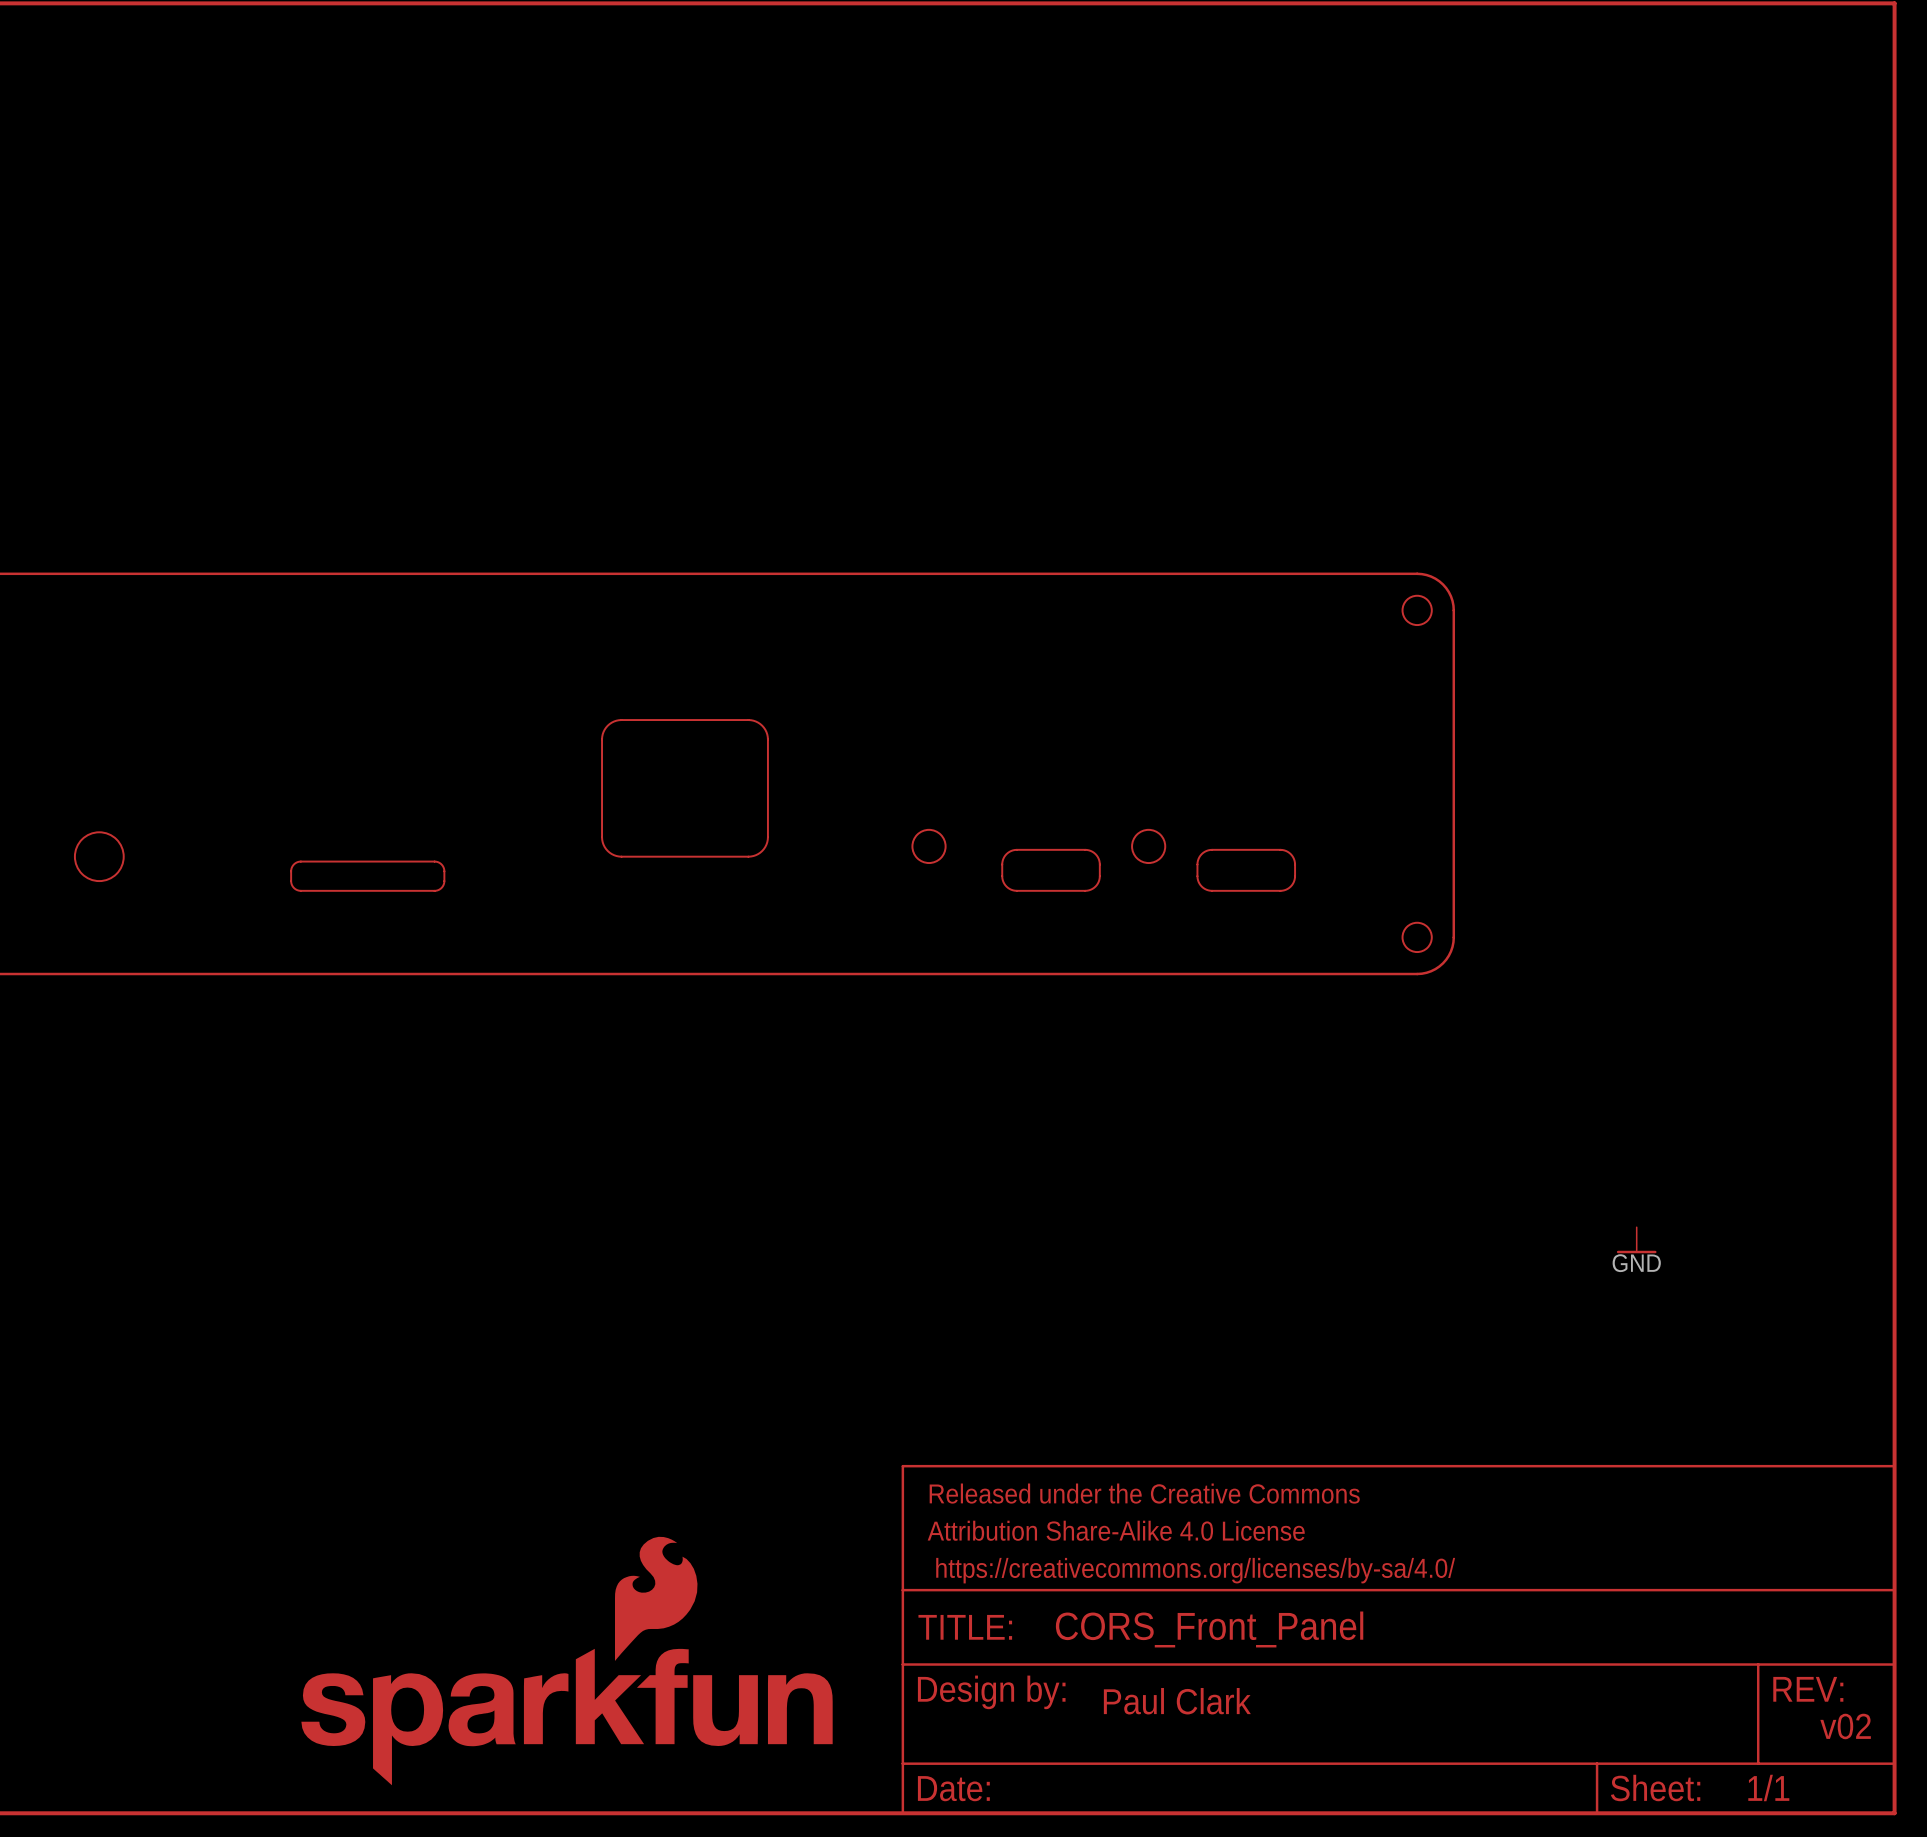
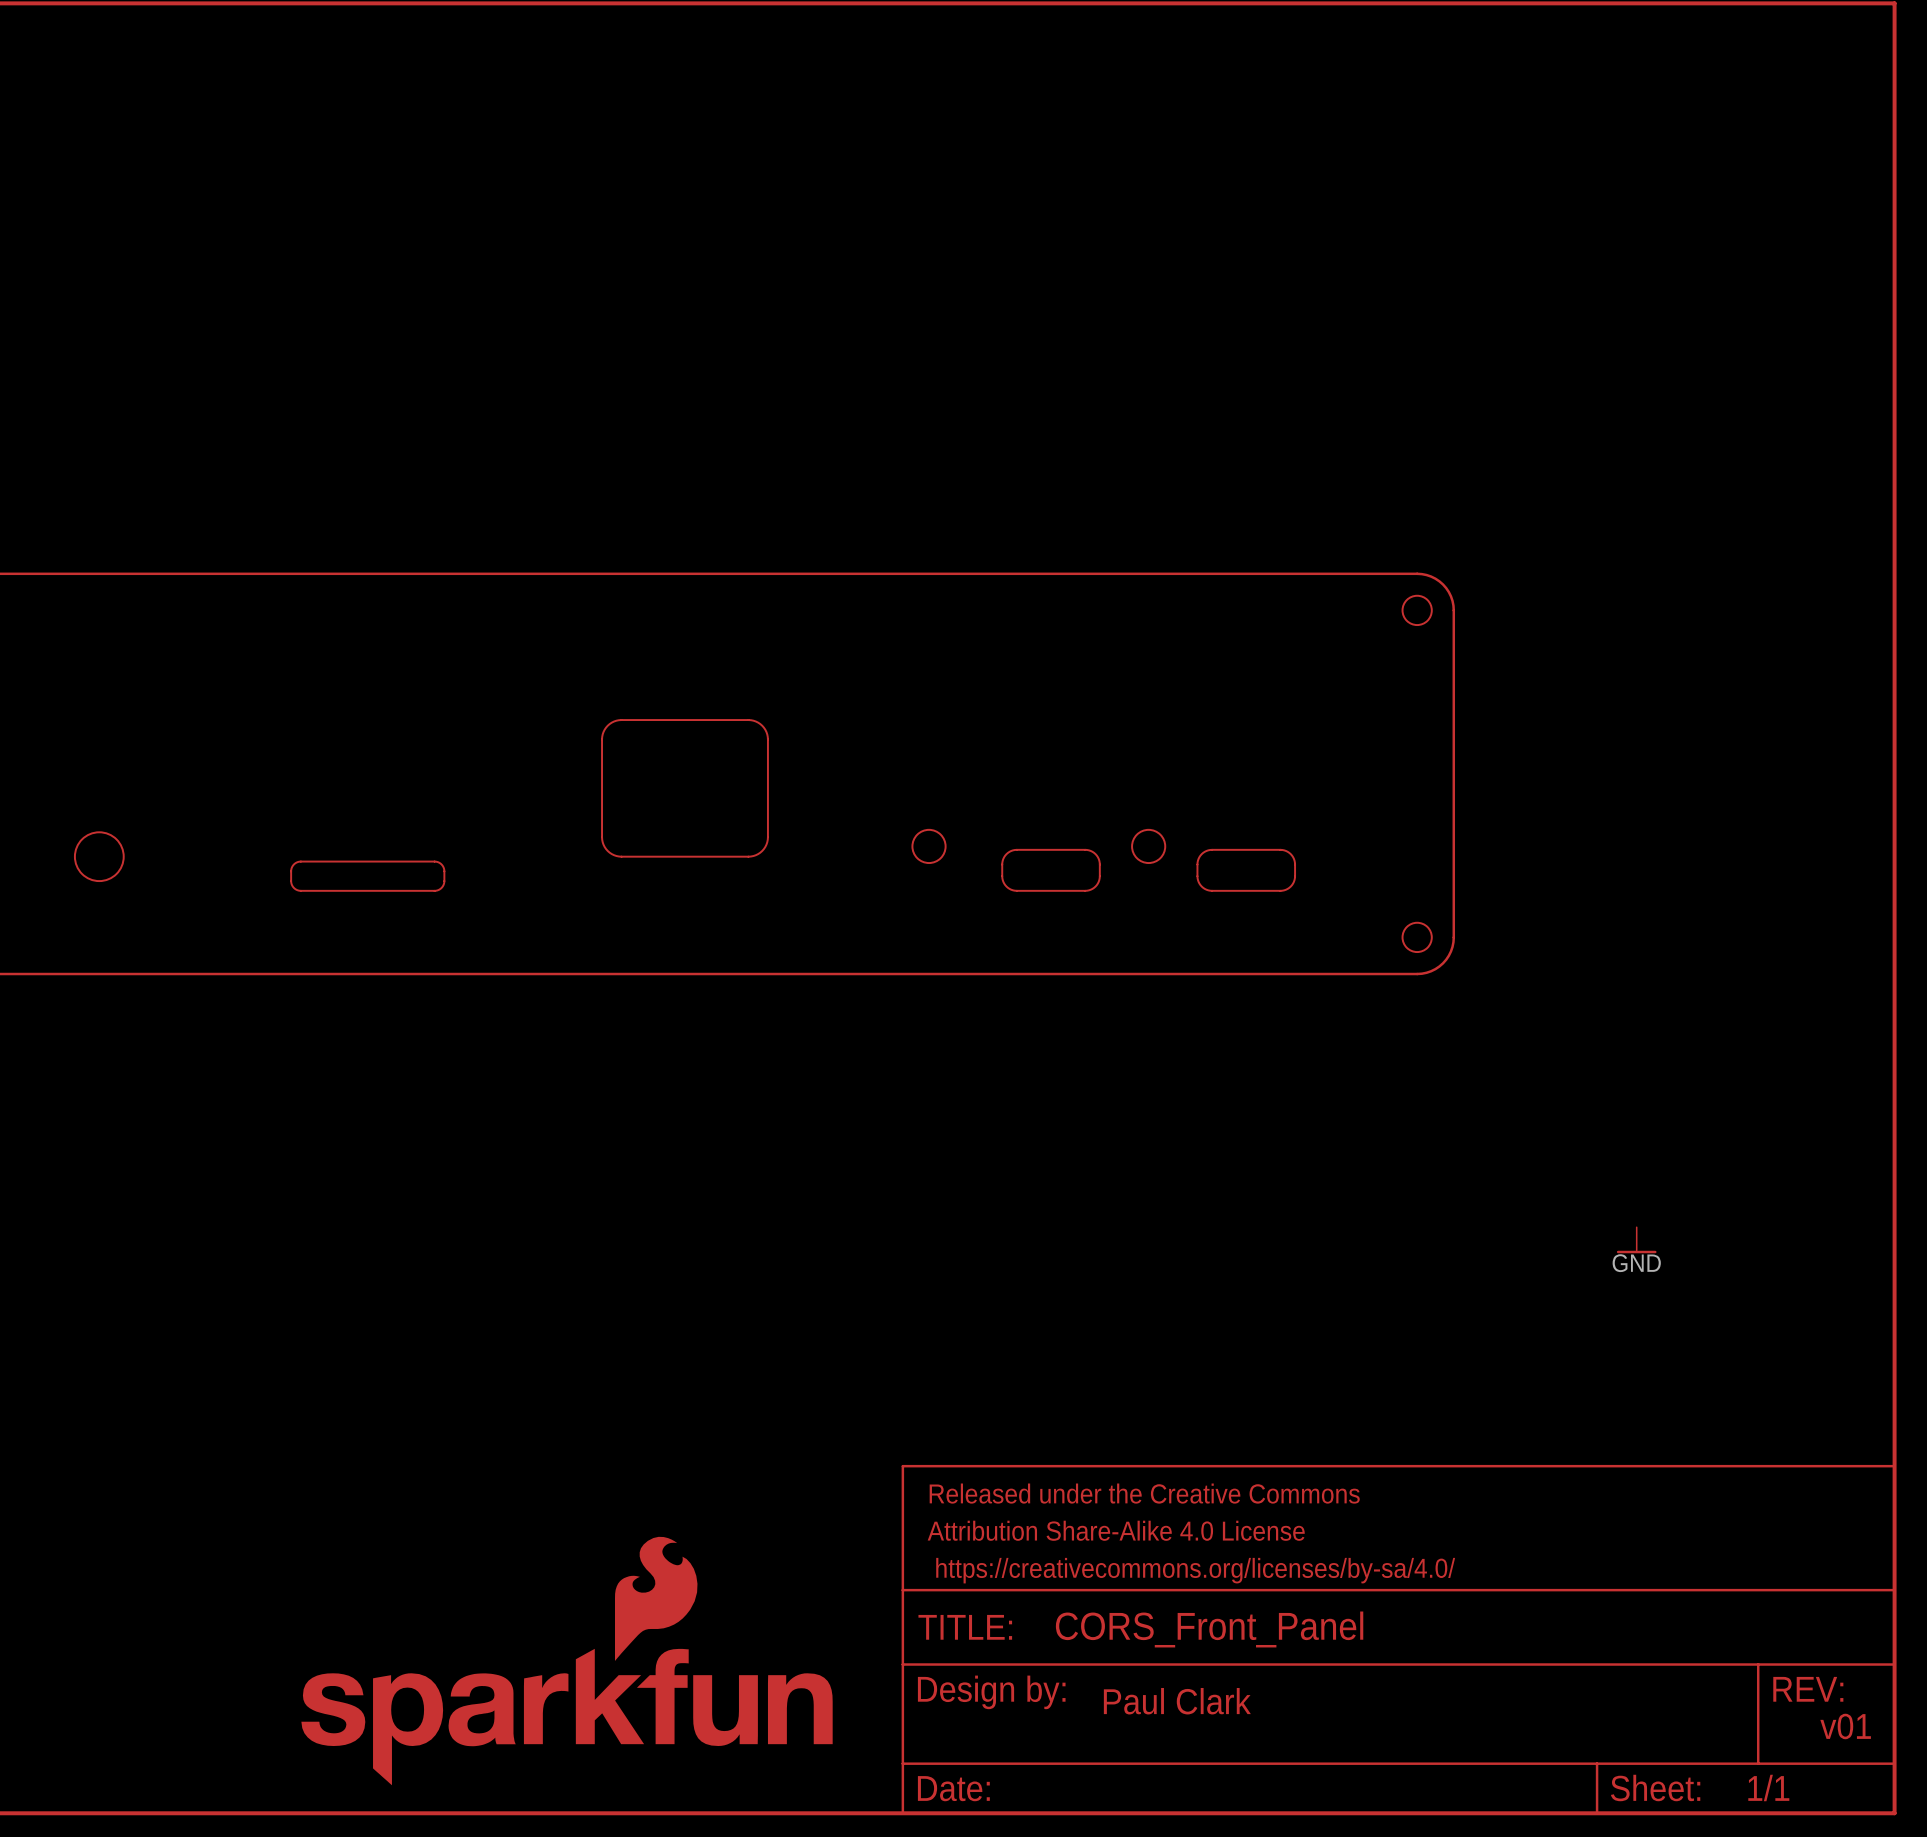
text: v02 (1845, 1726) -> v01 (1845, 1726)

